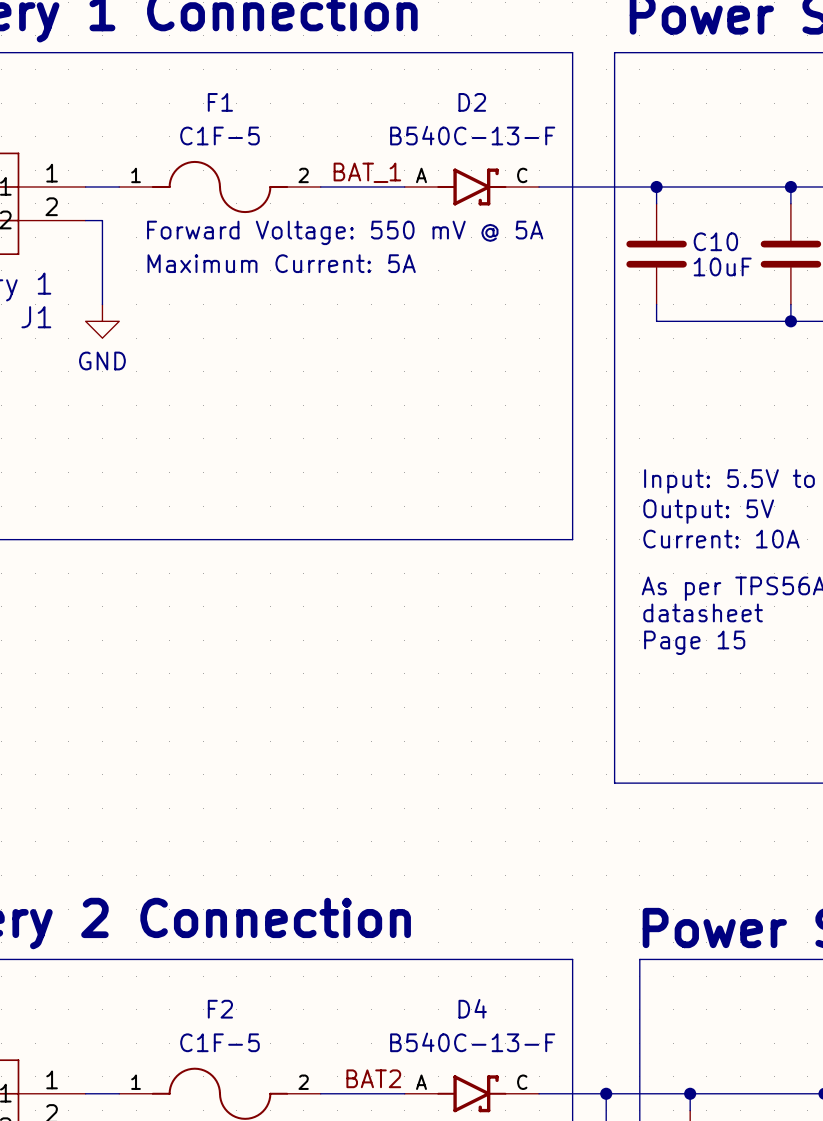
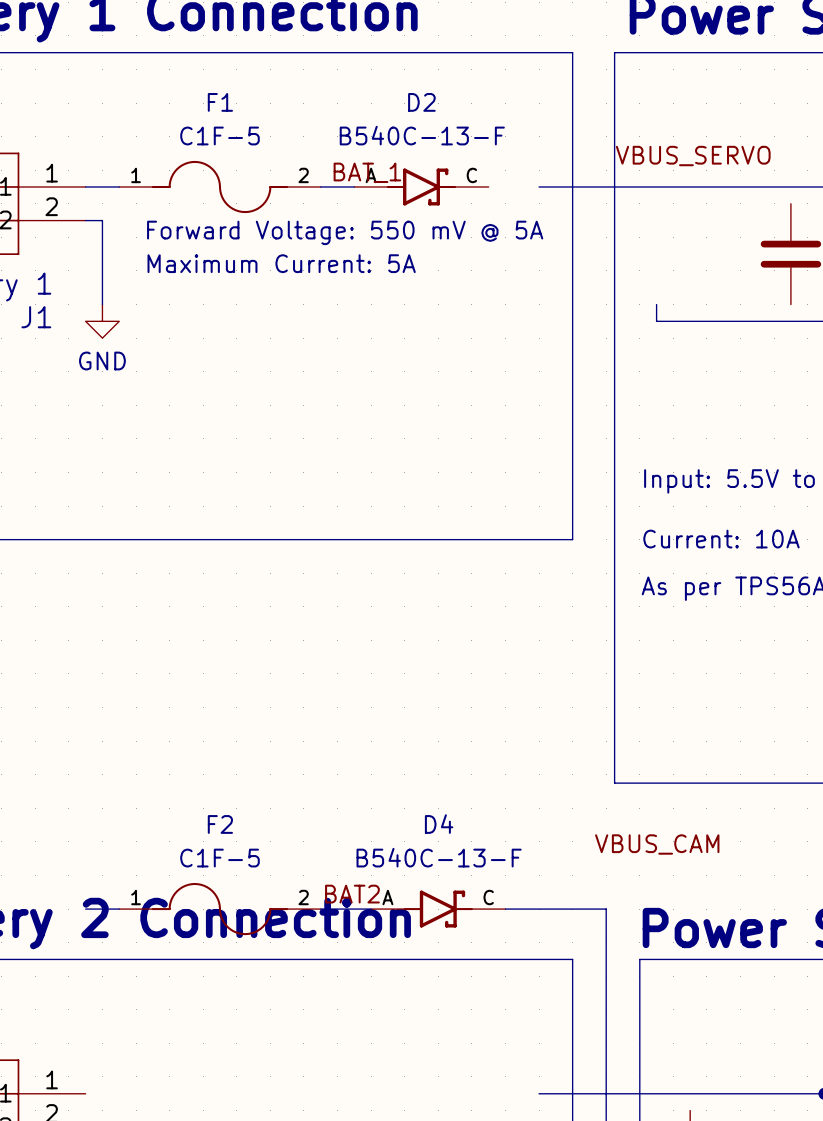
label: none -> VBUS_SERVO (693, 156)
D2 position: (471, 186) -> (421, 186)
wire: (656, 186) (656, 203) -> none
junction: (656, 186) -> none
wire: (790, 186) (790, 203) -> none
junction: (790, 186) -> none
C10: 10uF (656, 254) -> none
wire: (790, 304) (790, 321) -> none
junction: (790, 321) -> none
text: Output: 5V (708, 511) -> none
text: datasheet (703, 612) -> none
text: Page 15 (694, 642) -> none
label: none -> VBUS_CAM (657, 844)
wire: none -> (320, 909) (371, 909)
wire: none -> (505, 909) (606, 909) (606, 1093)
label position: BAT2 (373, 1078) -> BAT2 (352, 894)
wire: (85, 1093) (119, 1093) -> (85, 909) (119, 909)
F2 position: (219, 1093) -> (219, 909)
wire: (320, 1093) (404, 1093) -> none
D4 position: (471, 1093) -> (438, 909)
junction: (606, 1093) -> none
wire: (690, 1093) (690, 1110) -> none
junction: (690, 1093) -> none

